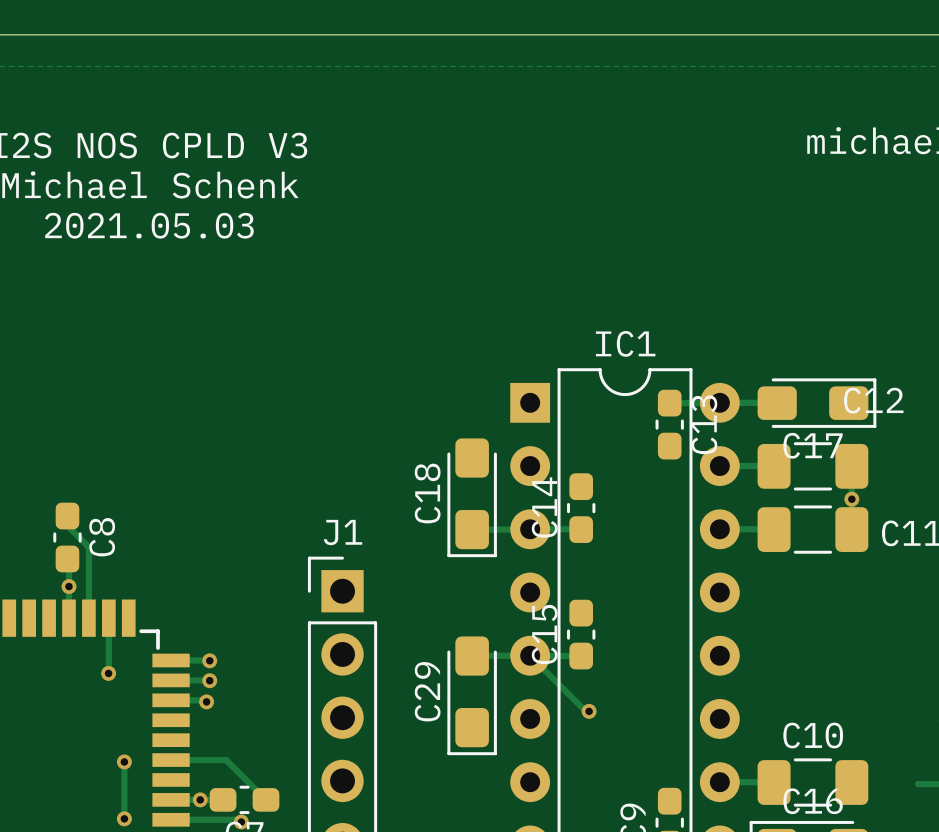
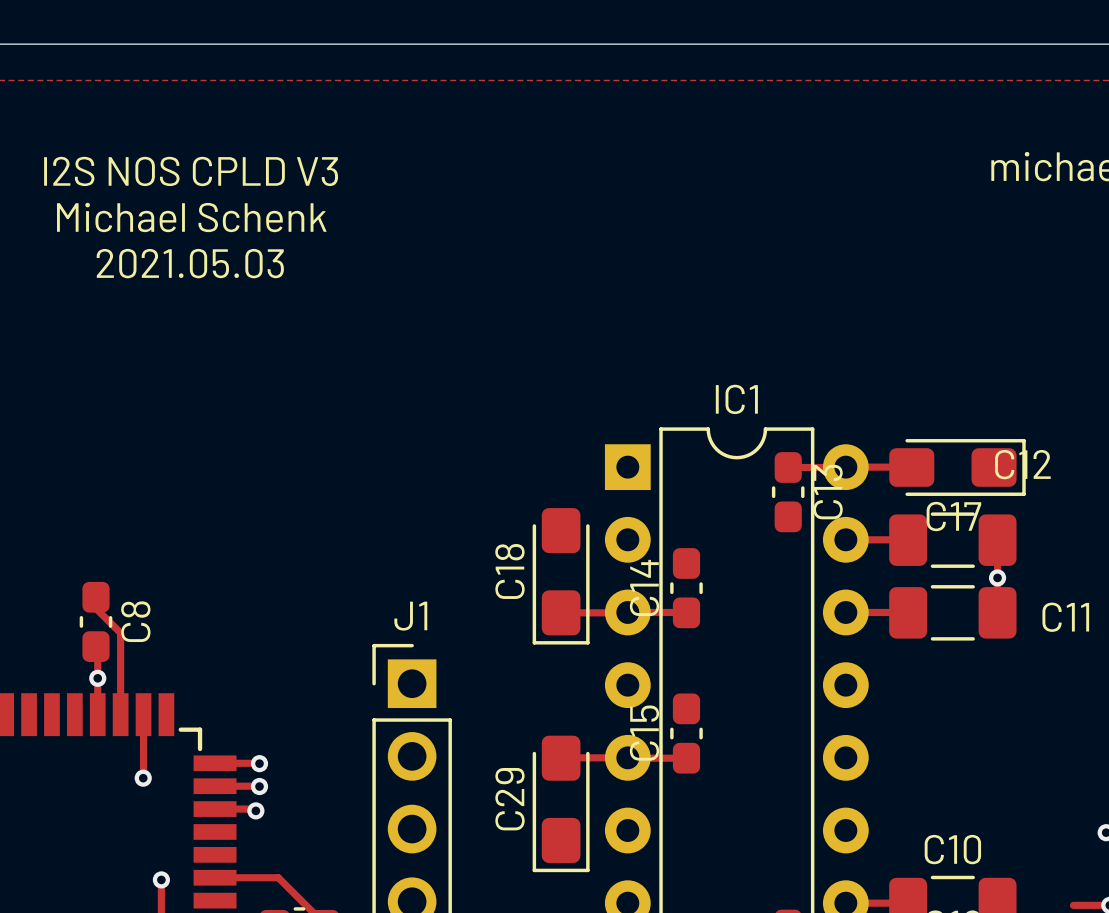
track: (530, 656) (585, 711) (589, 711) -> none
via: (589, 711) -> none

